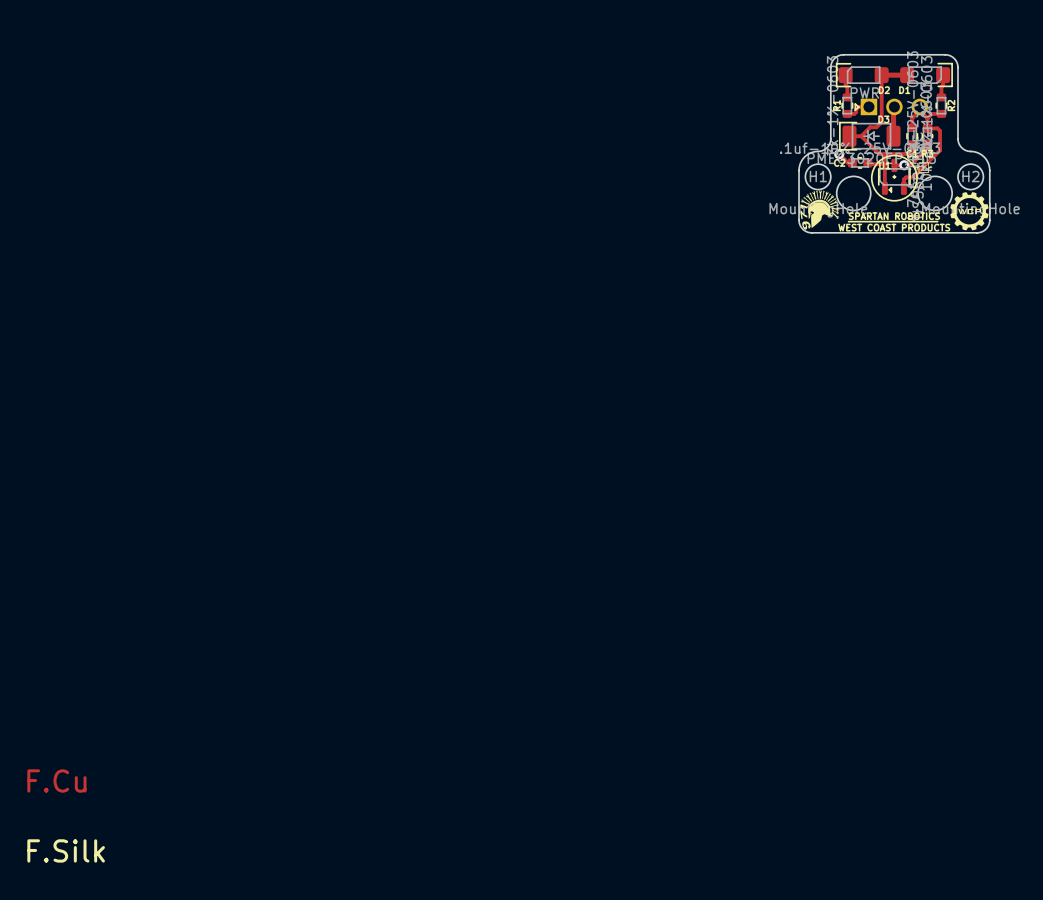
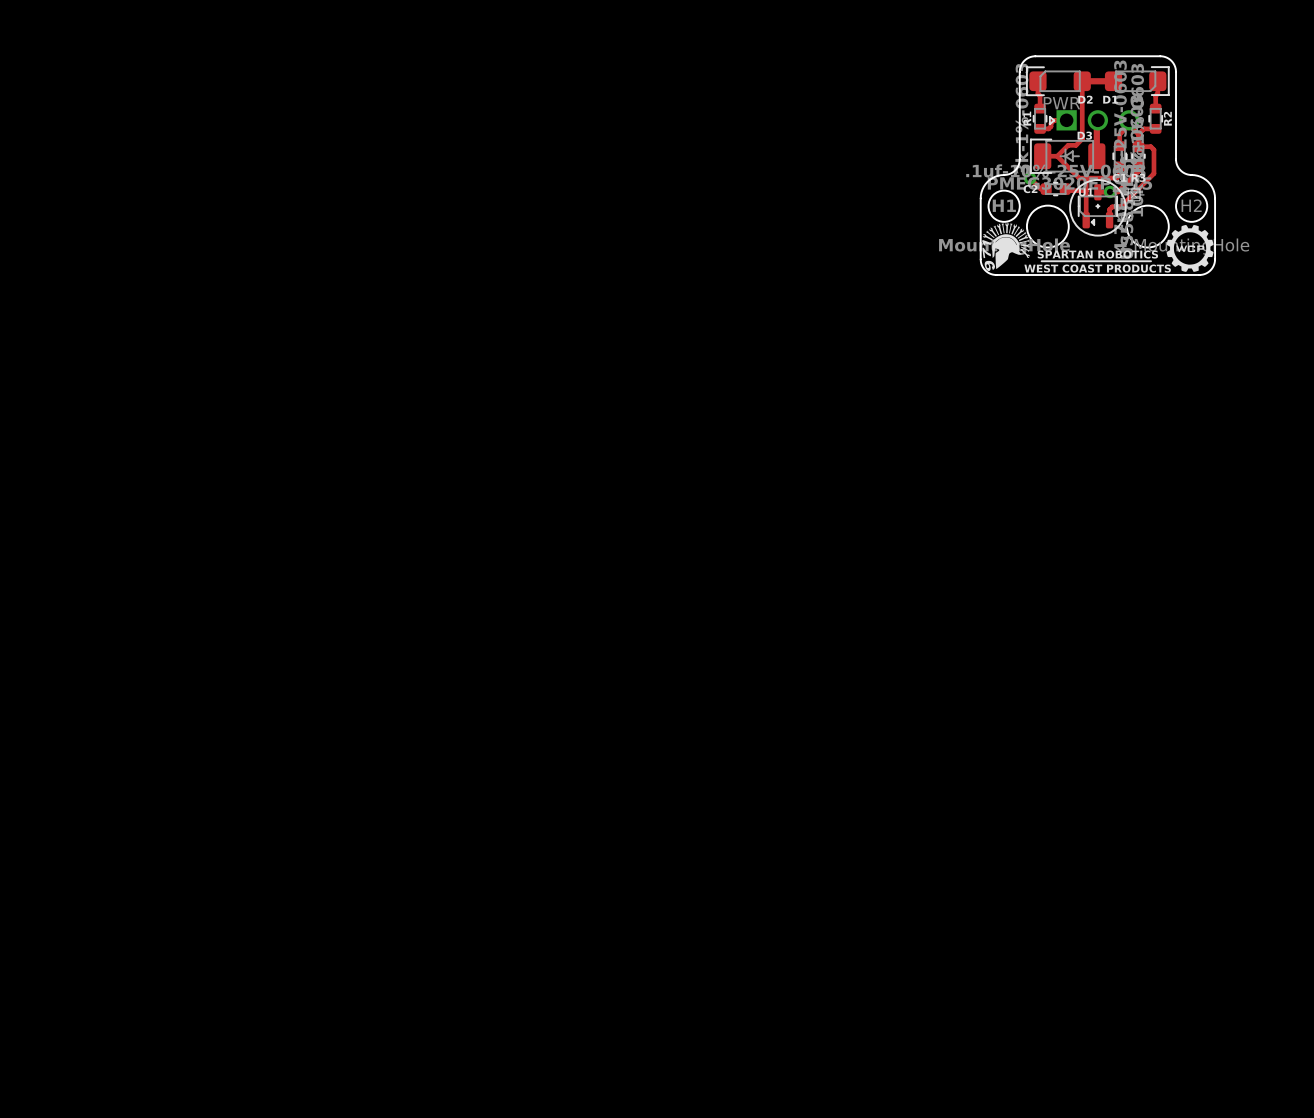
text: F.Cu (56, 781) -> none
text: F.Silk (66, 850) -> none

